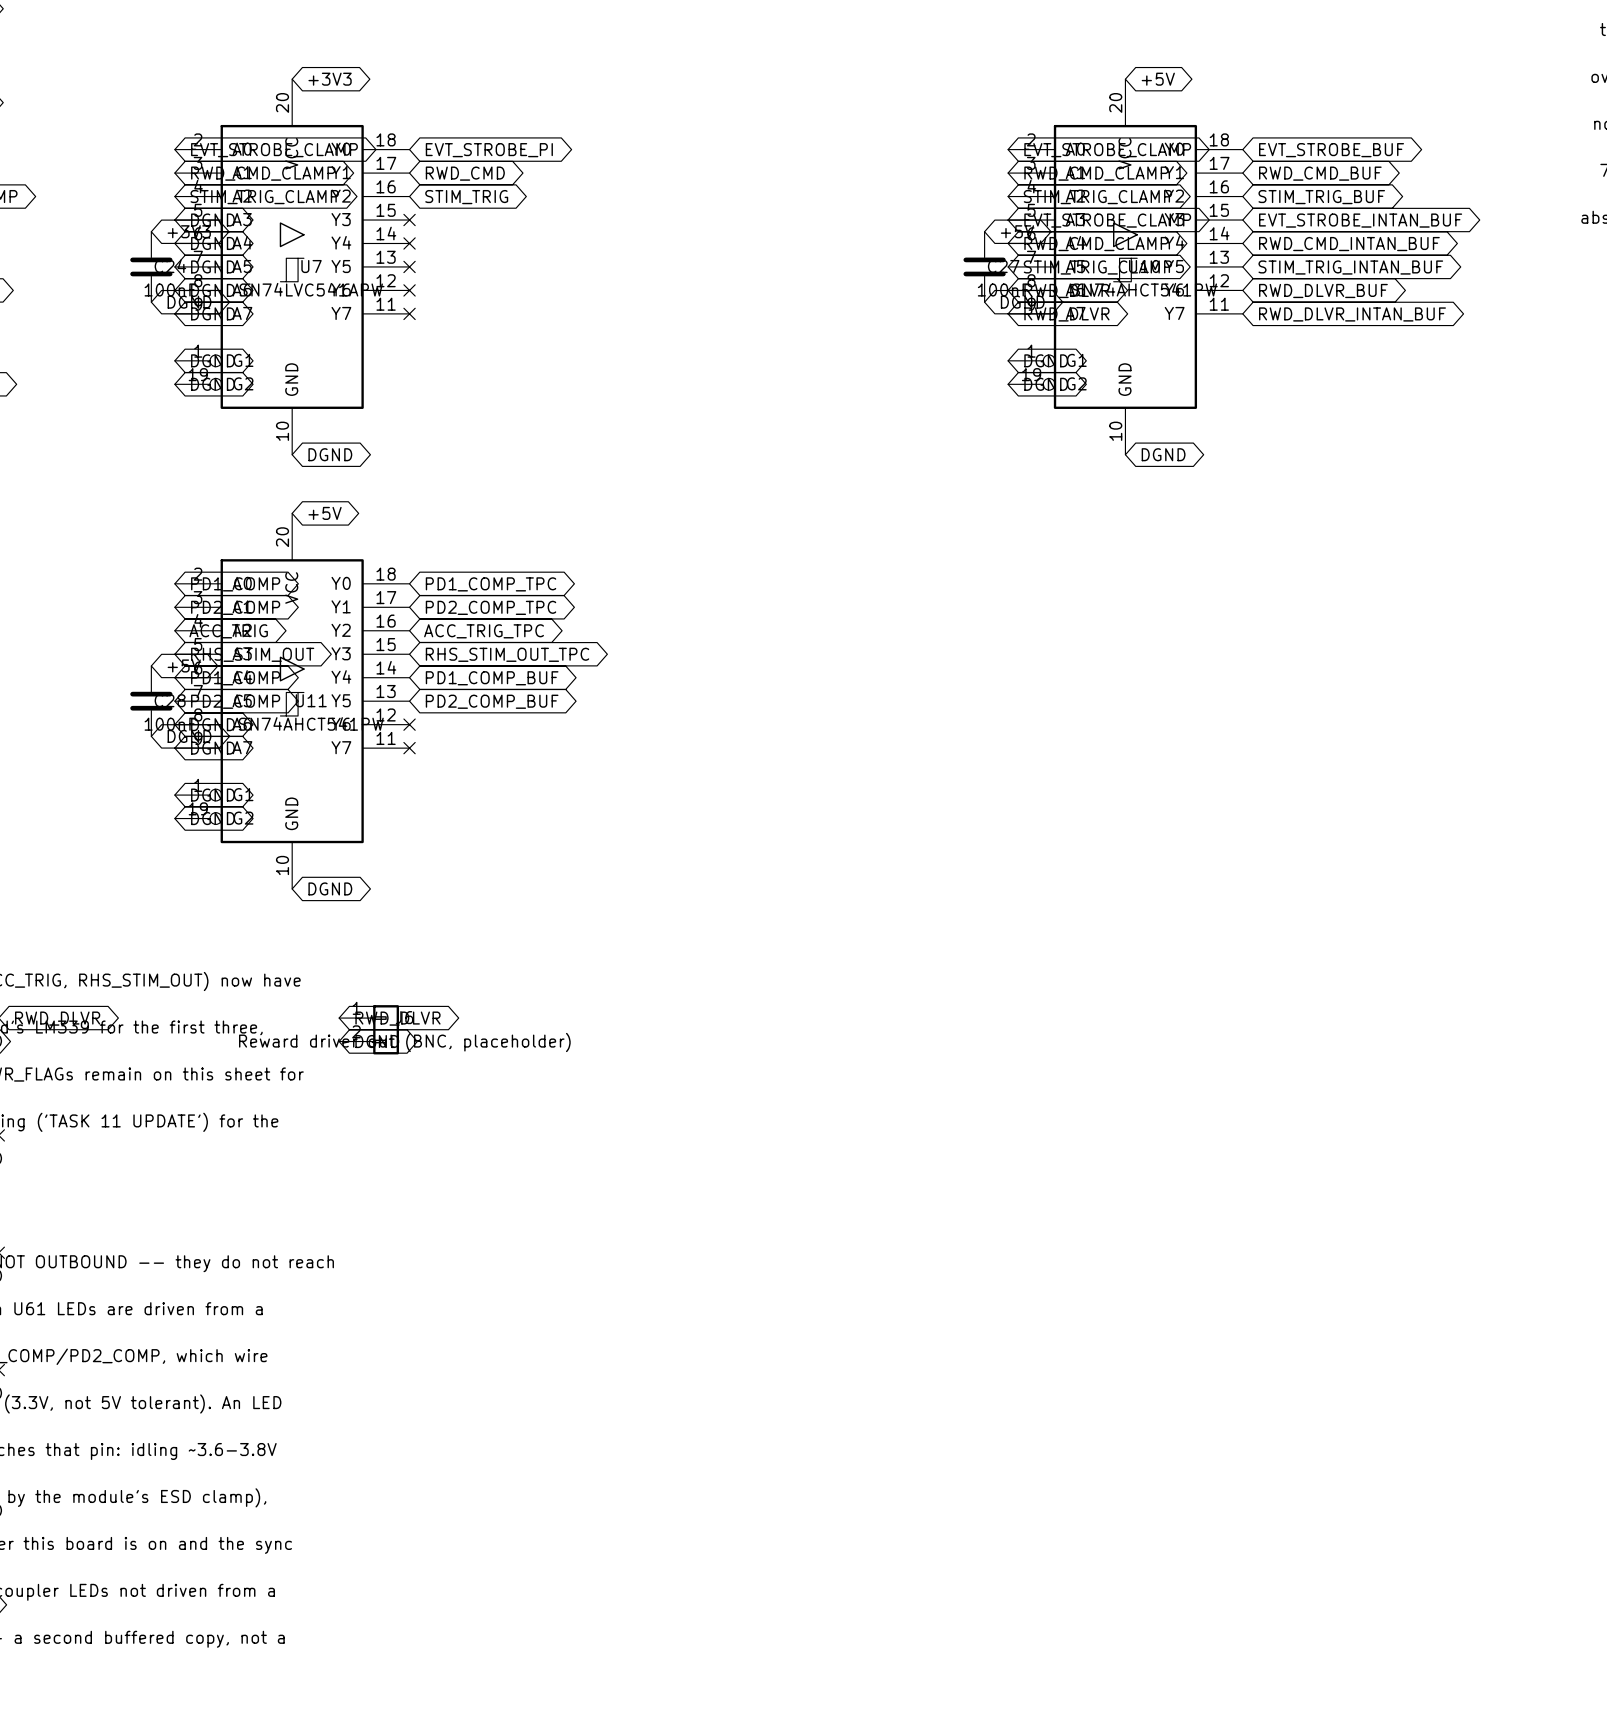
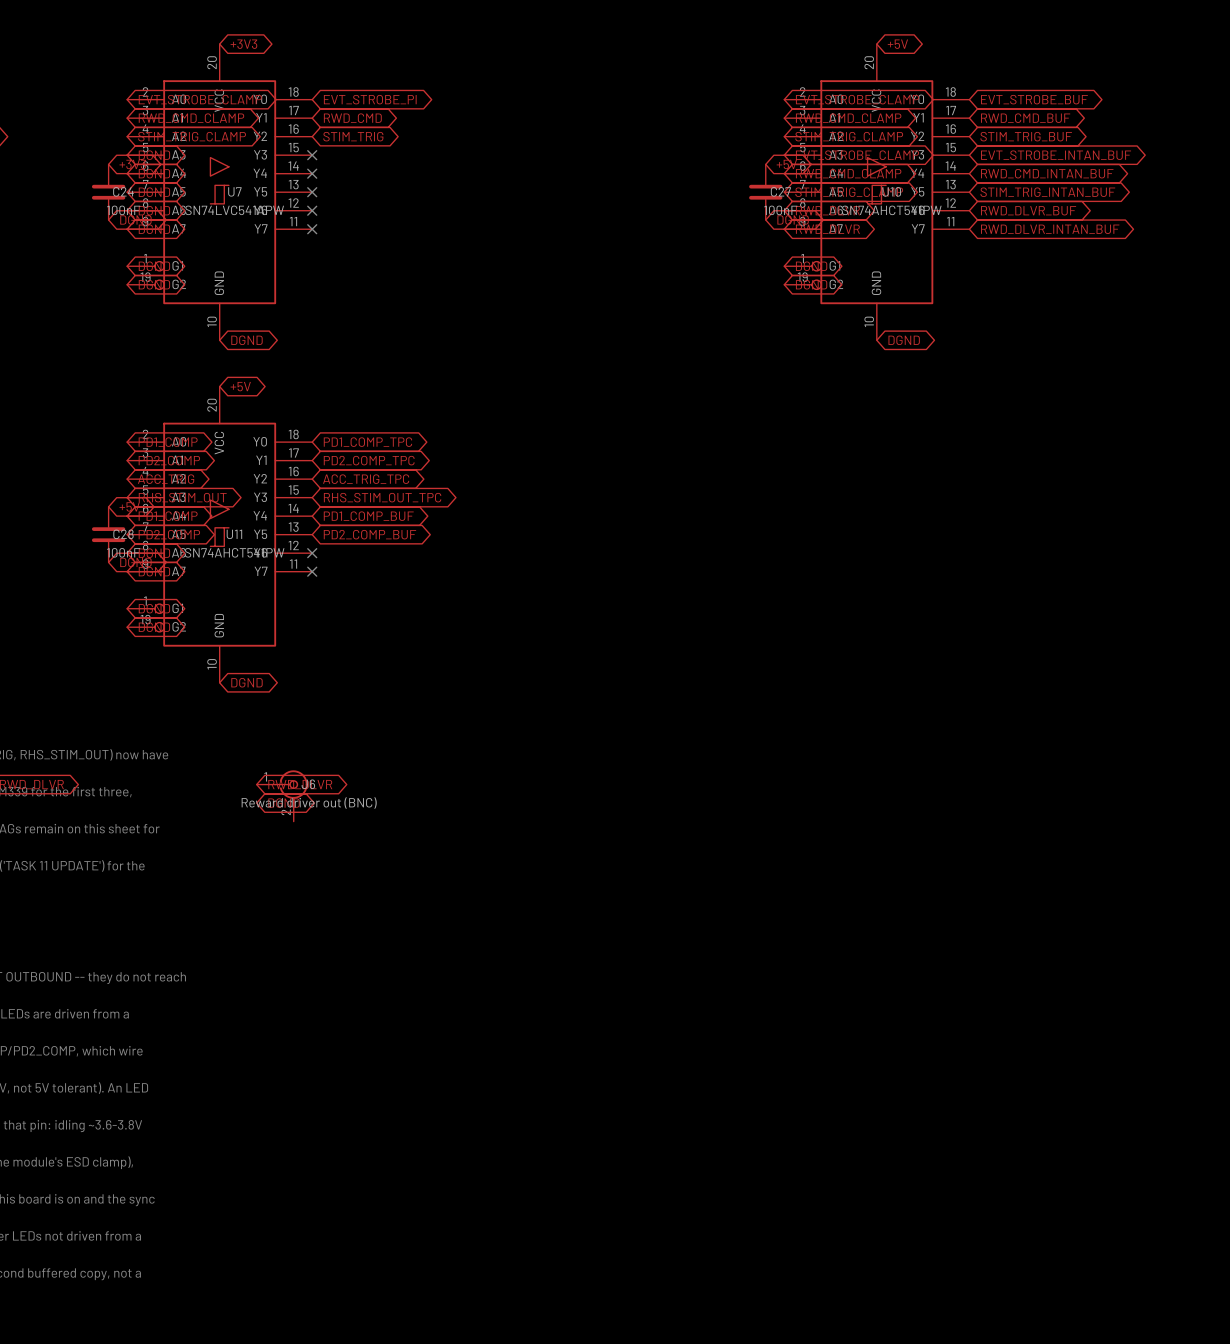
J6 symbol: [339, 1005, 399, 1055] -> [256, 770, 308, 822]
J6 value: Reward driver out (BNC, placeholder) (404, 1042) -> Reward driver out (BNC) (309, 803)

